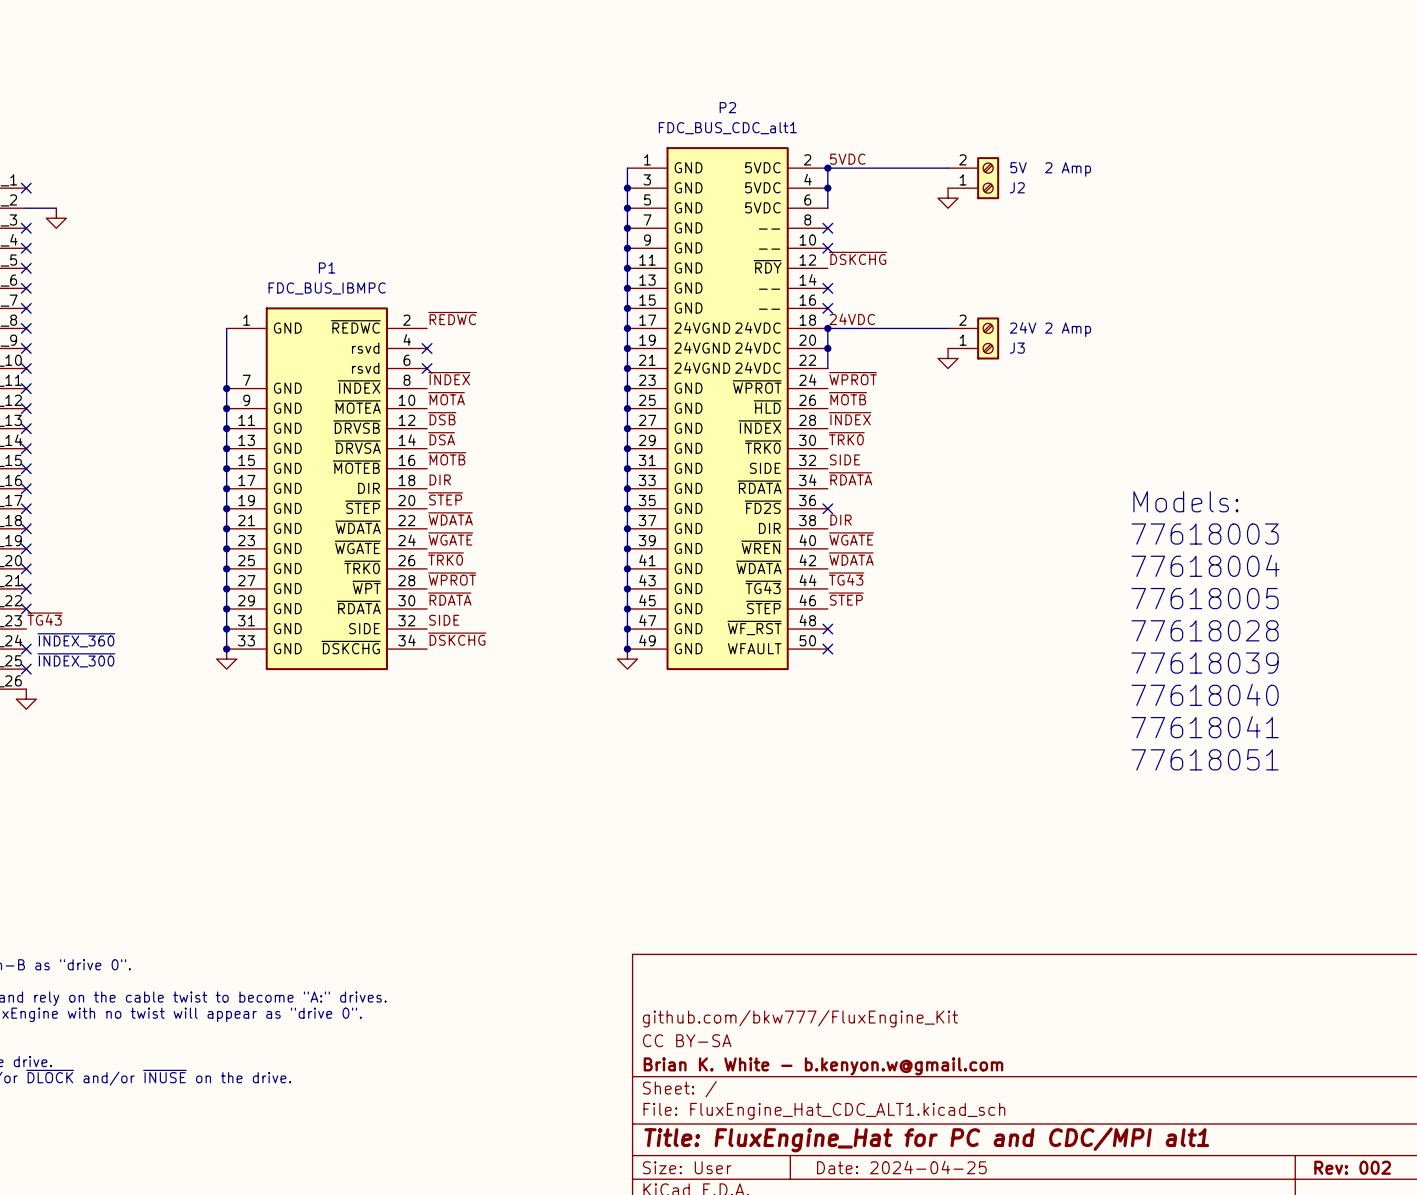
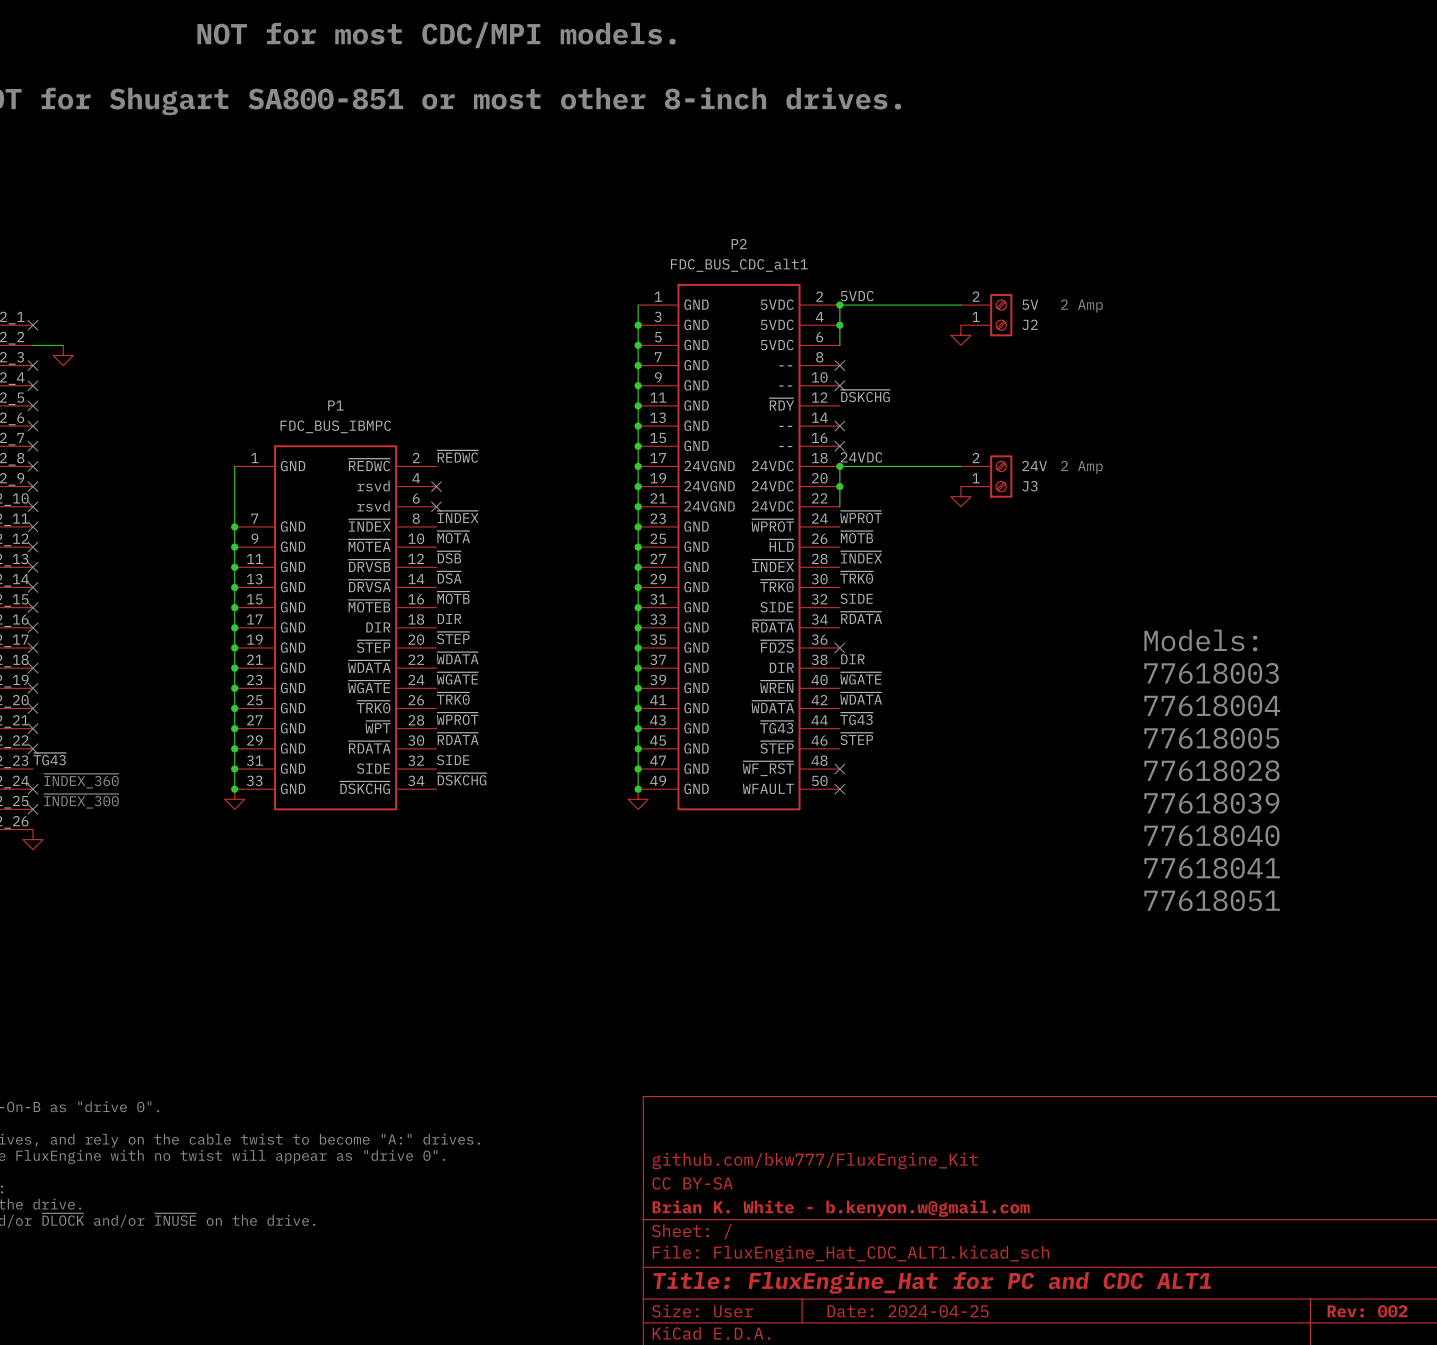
title block: Title: FluxEngine_Hat for PC and CDC/MPI alt1 (926, 1139) -> Title: FluxEngine_Hat for PC and CDC ALT1 (932, 1282)

